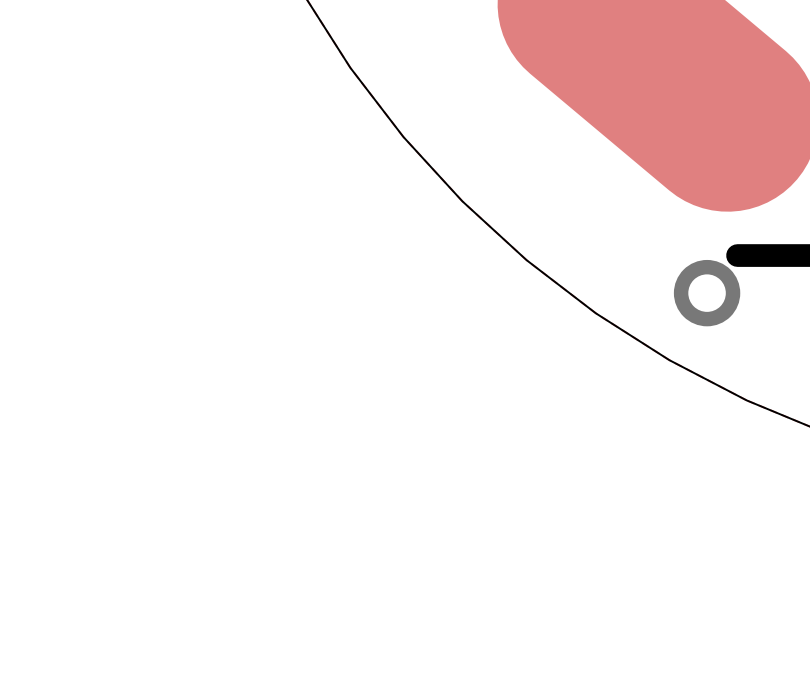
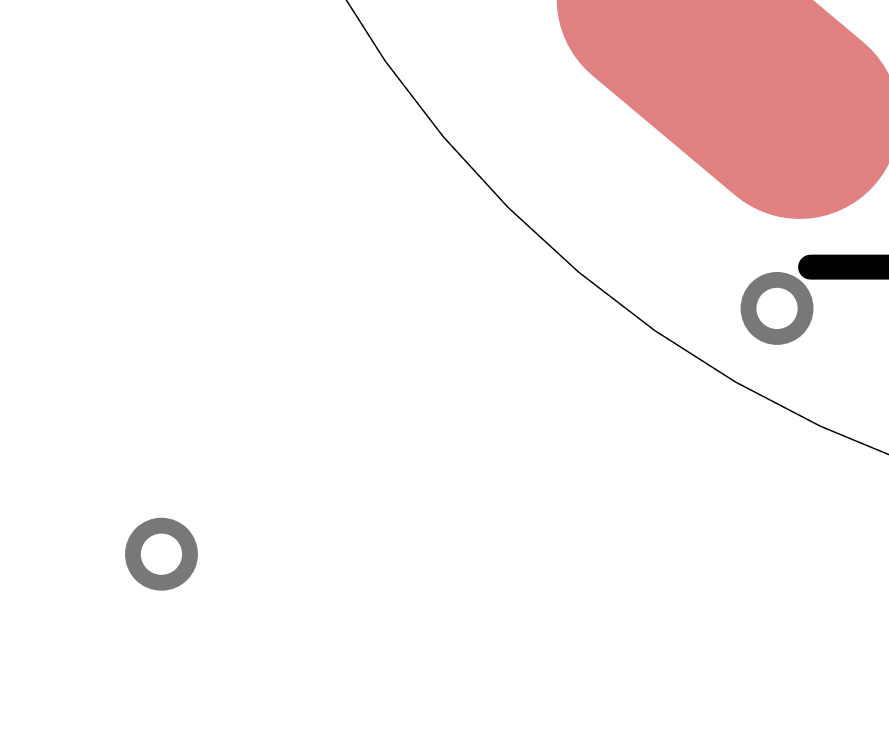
via: none -> (161, 554)

